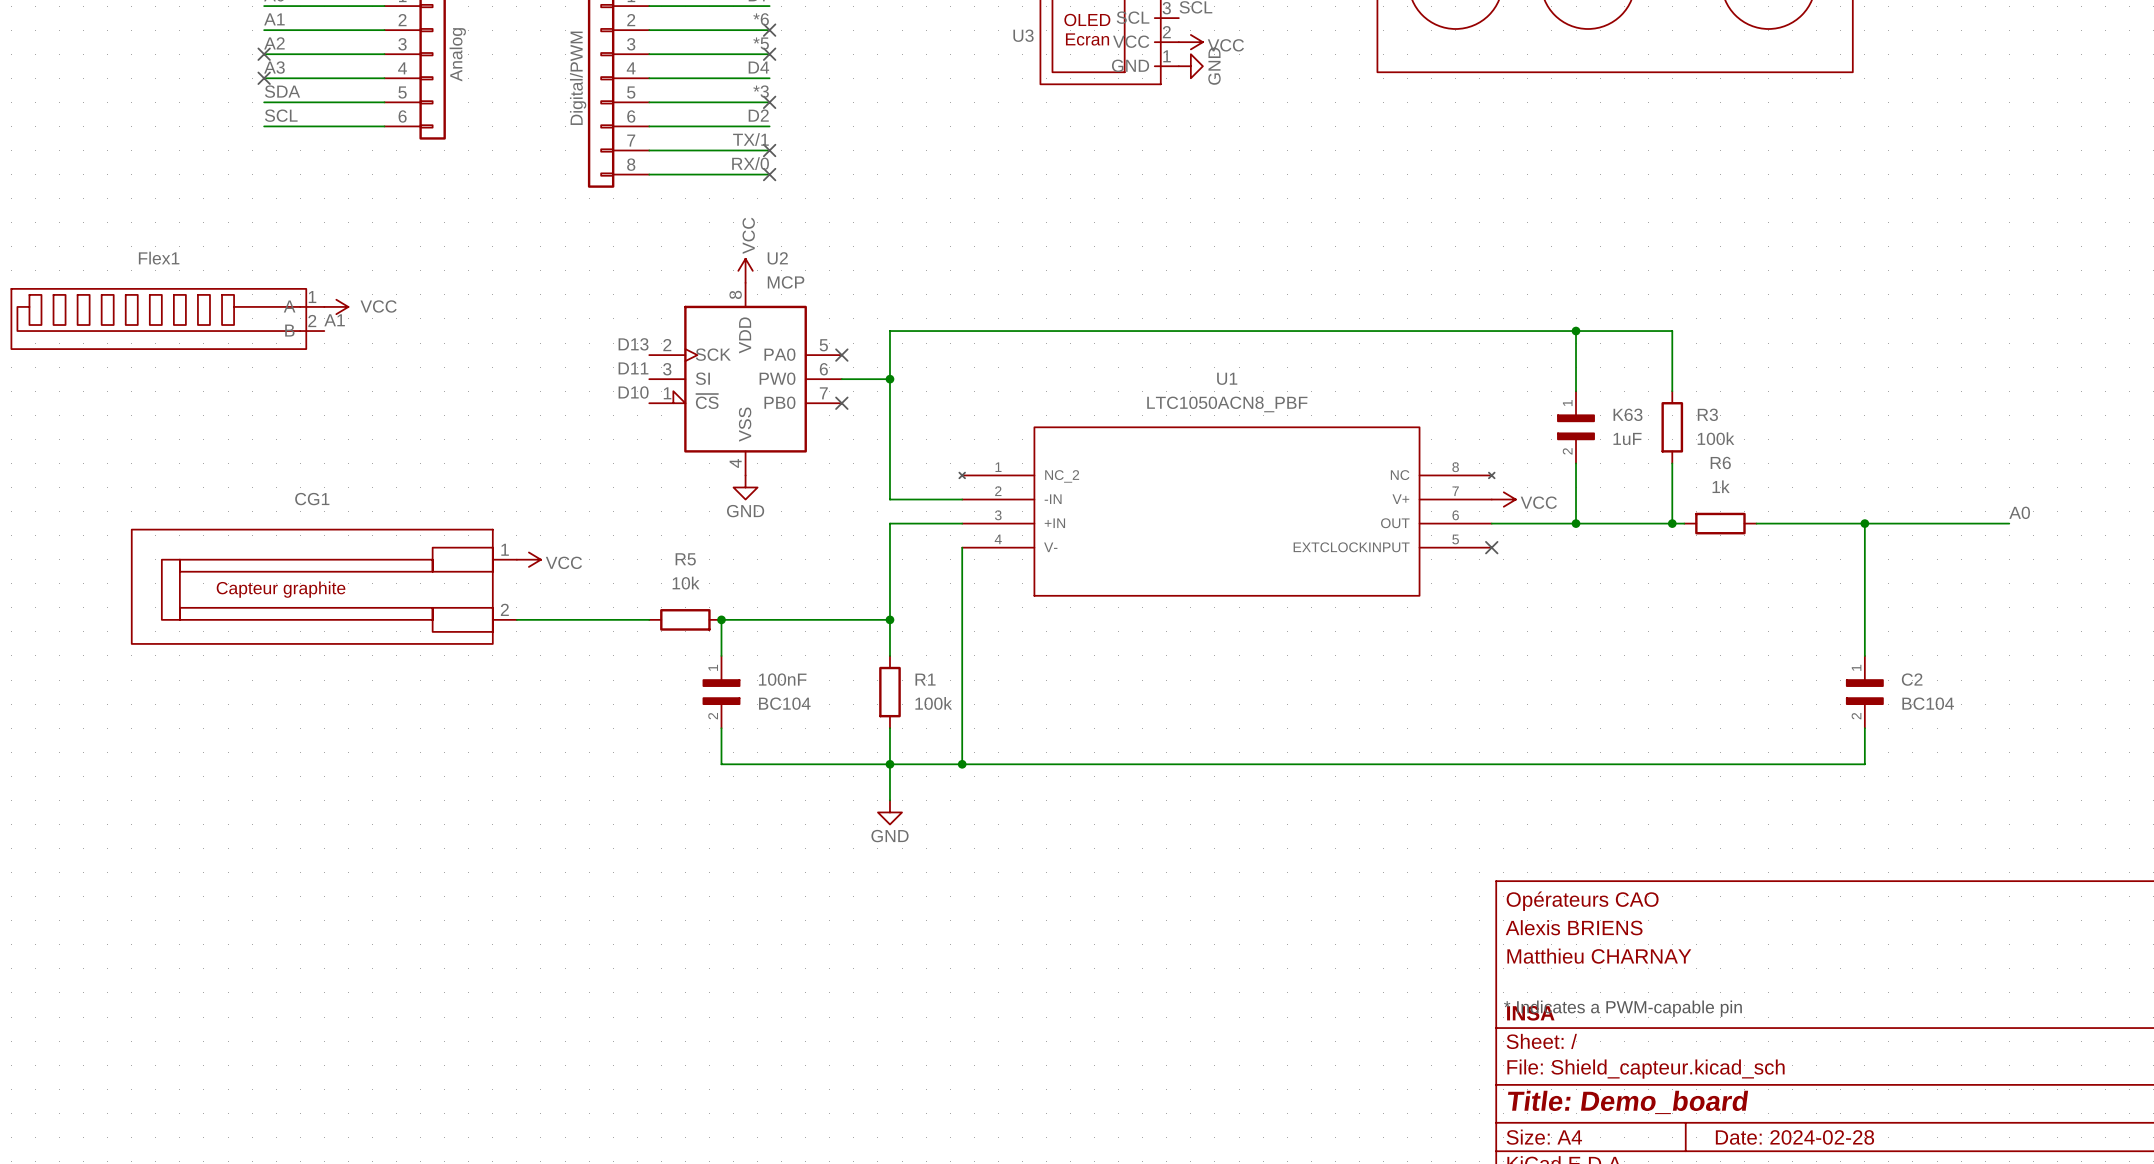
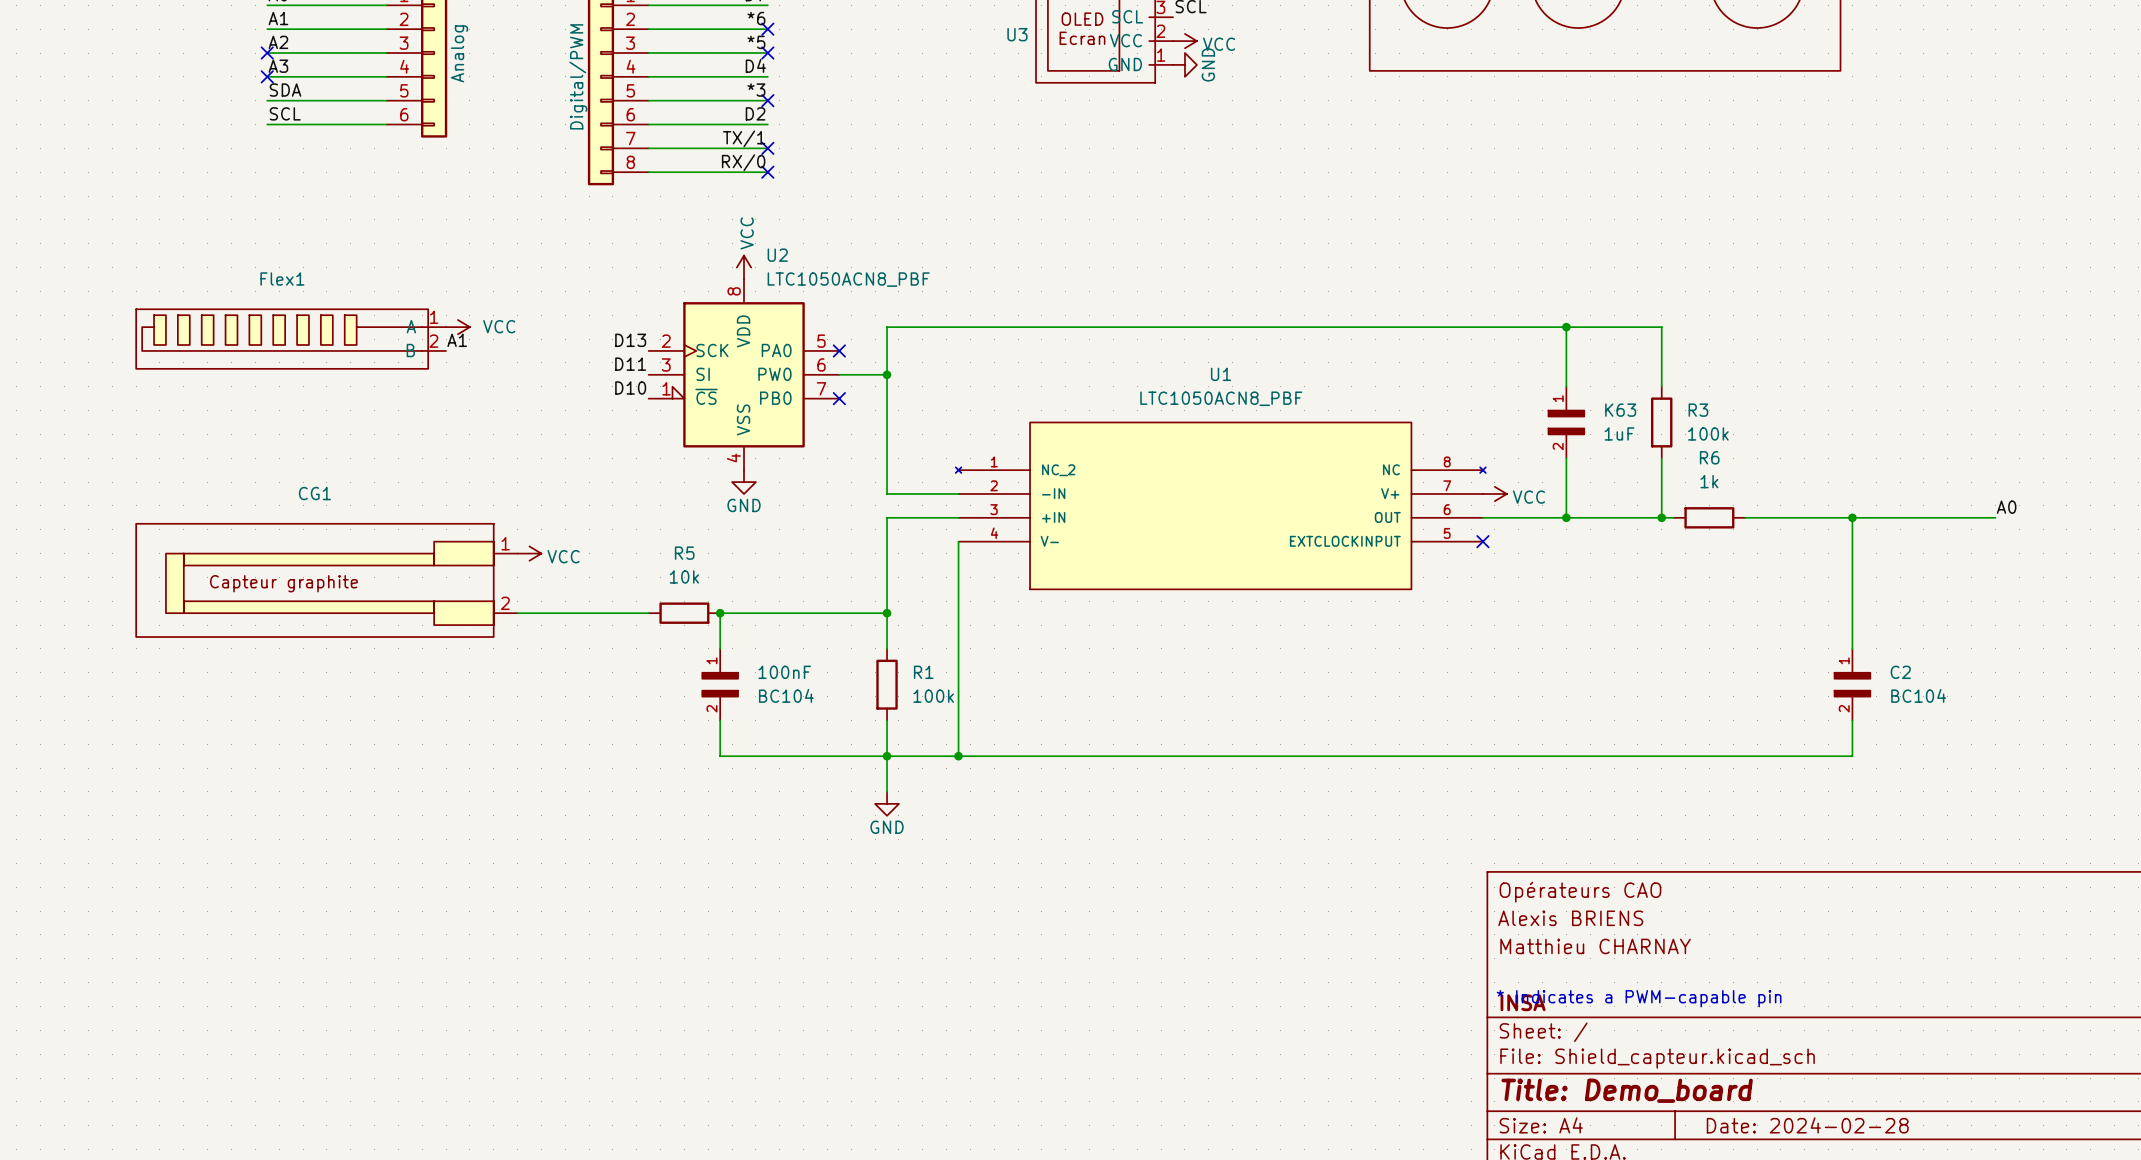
U2 value: MCP (786, 282) -> LTC1050ACN8_PBF (848, 279)
power symbol position: VCC (336, 306) -> VCC (457, 327)
Flex1 position: (167, 318) -> (291, 339)
label position: A1 (334, 320) -> A1 (457, 340)

